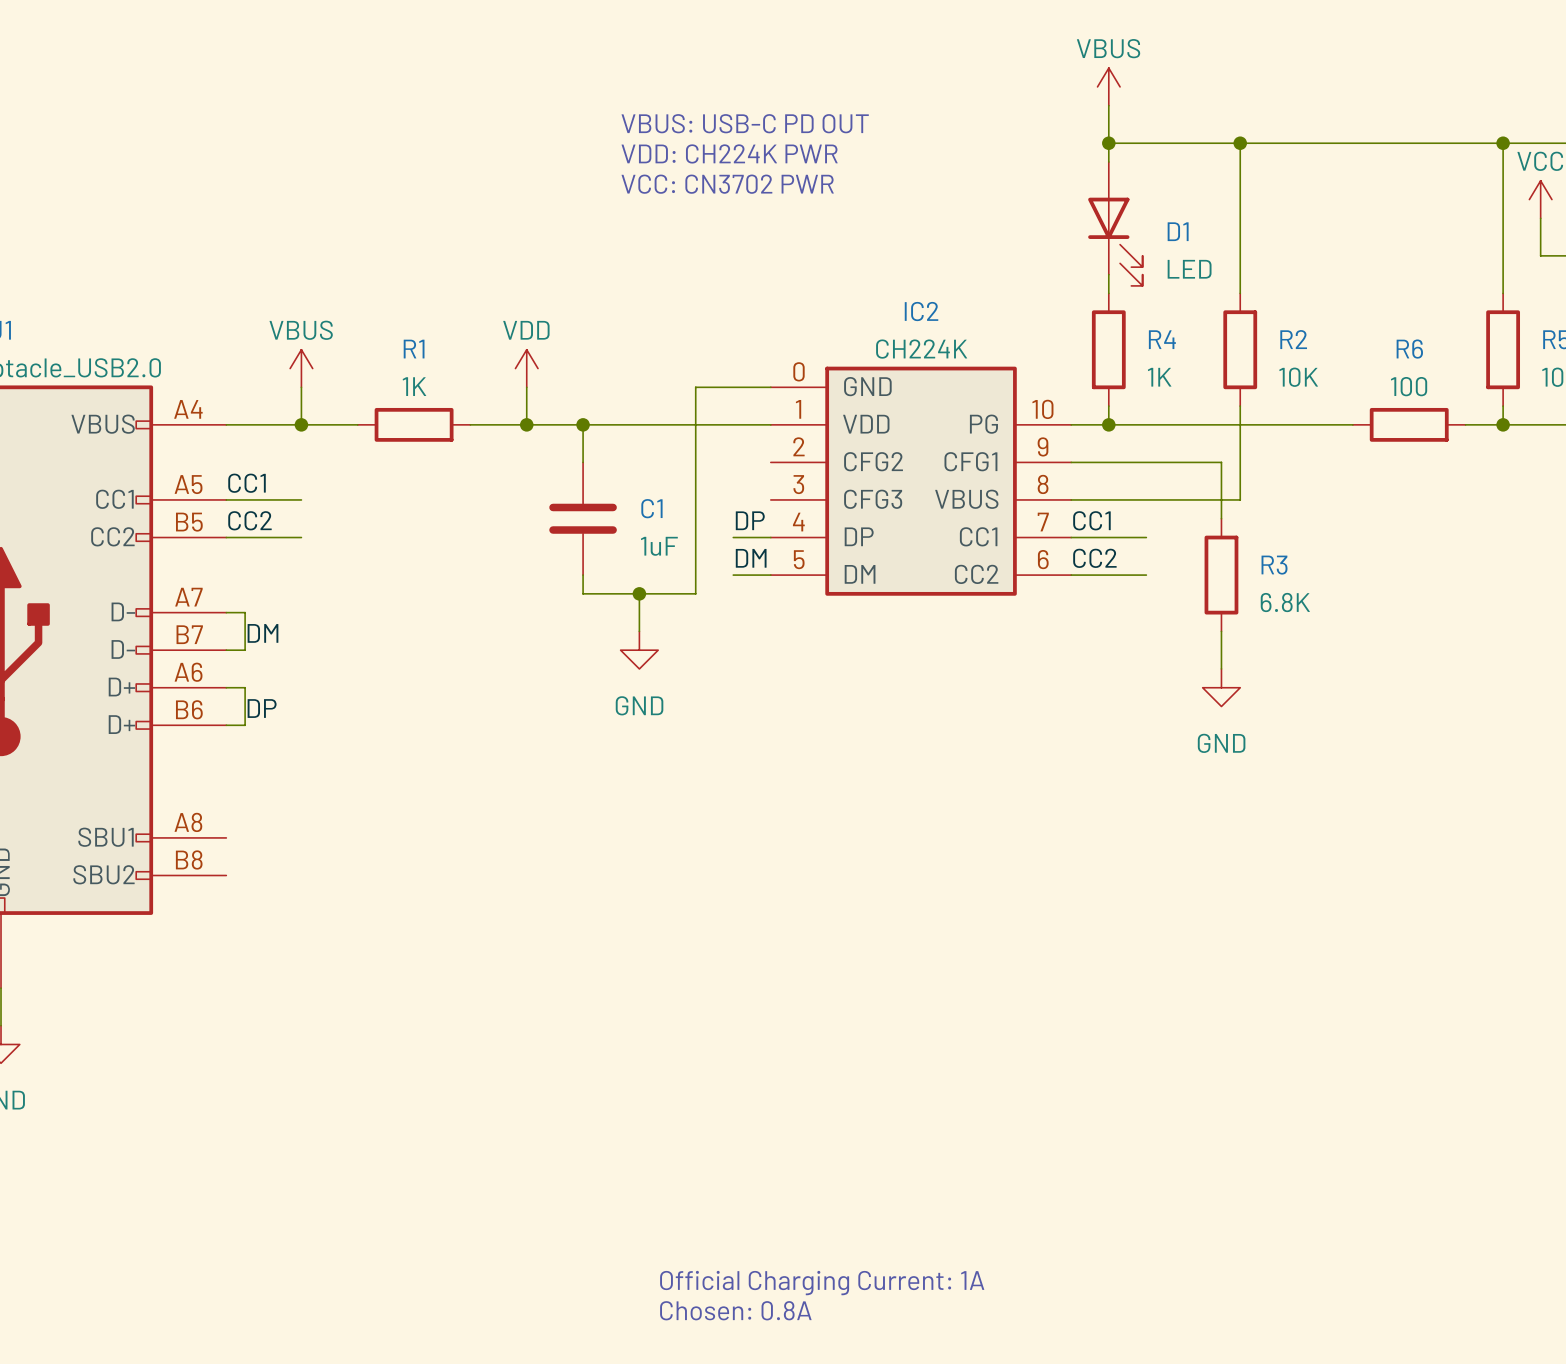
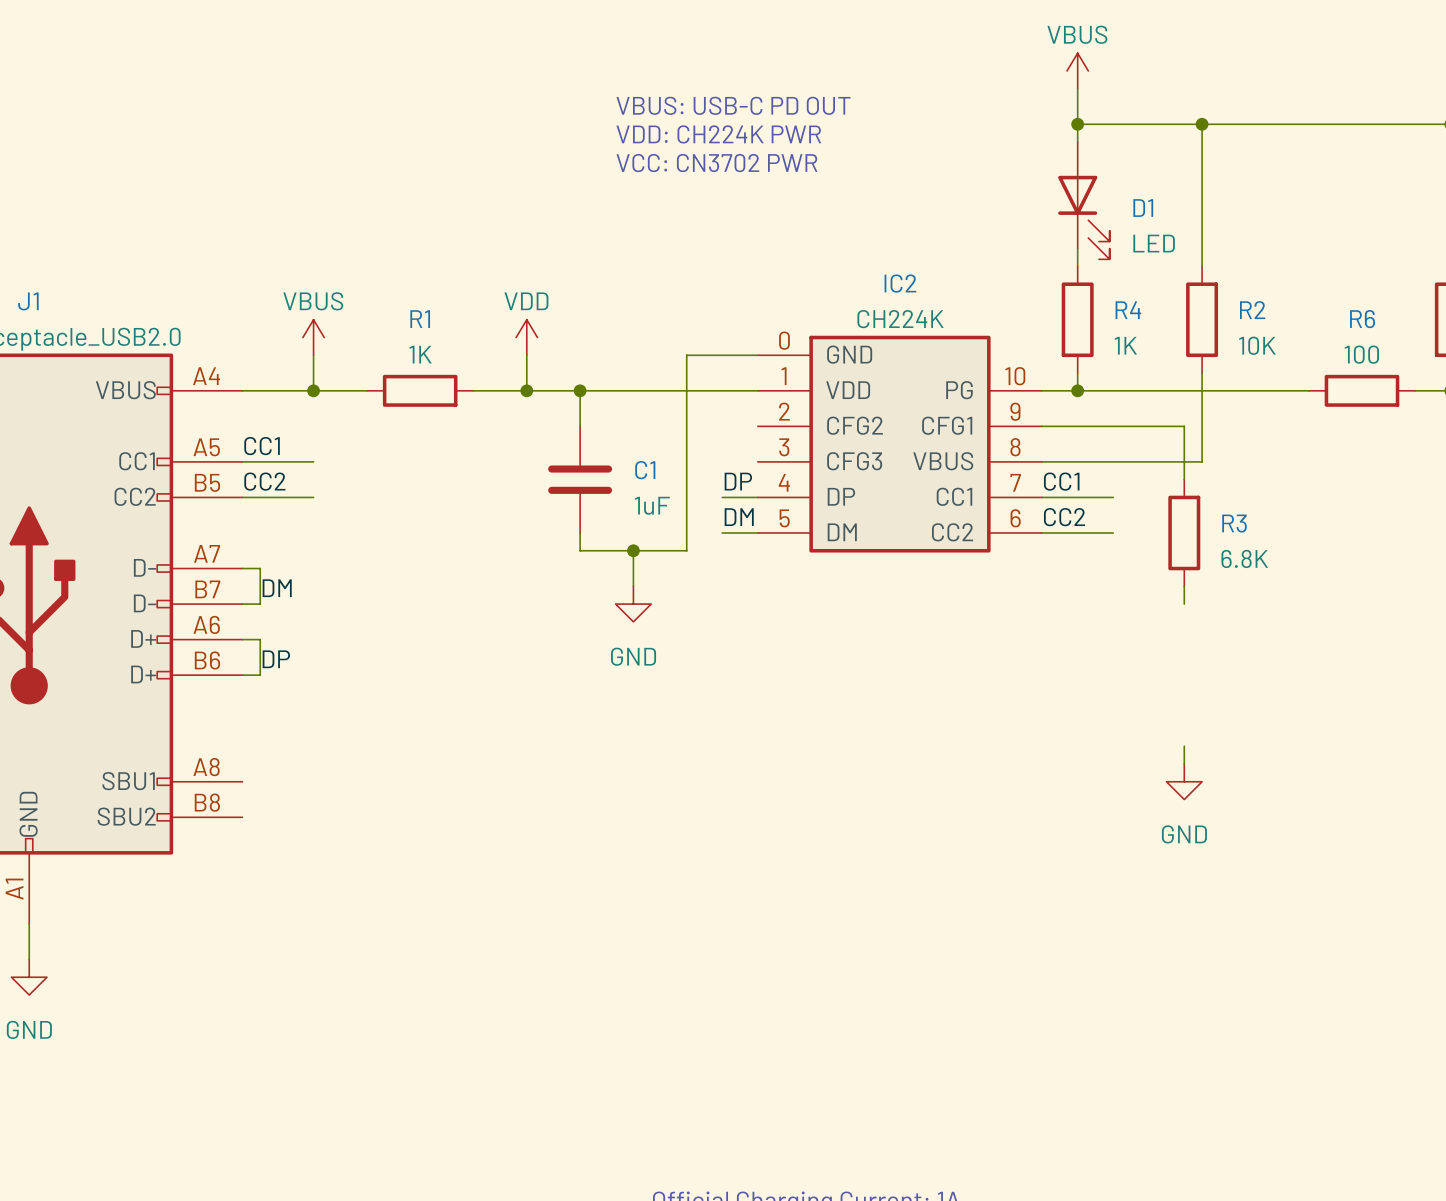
wire: (1221, 650) (1221, 668) -> (1184, 746) (1184, 764)
power symbol position: GND (1221, 687) -> GND (1184, 781)

